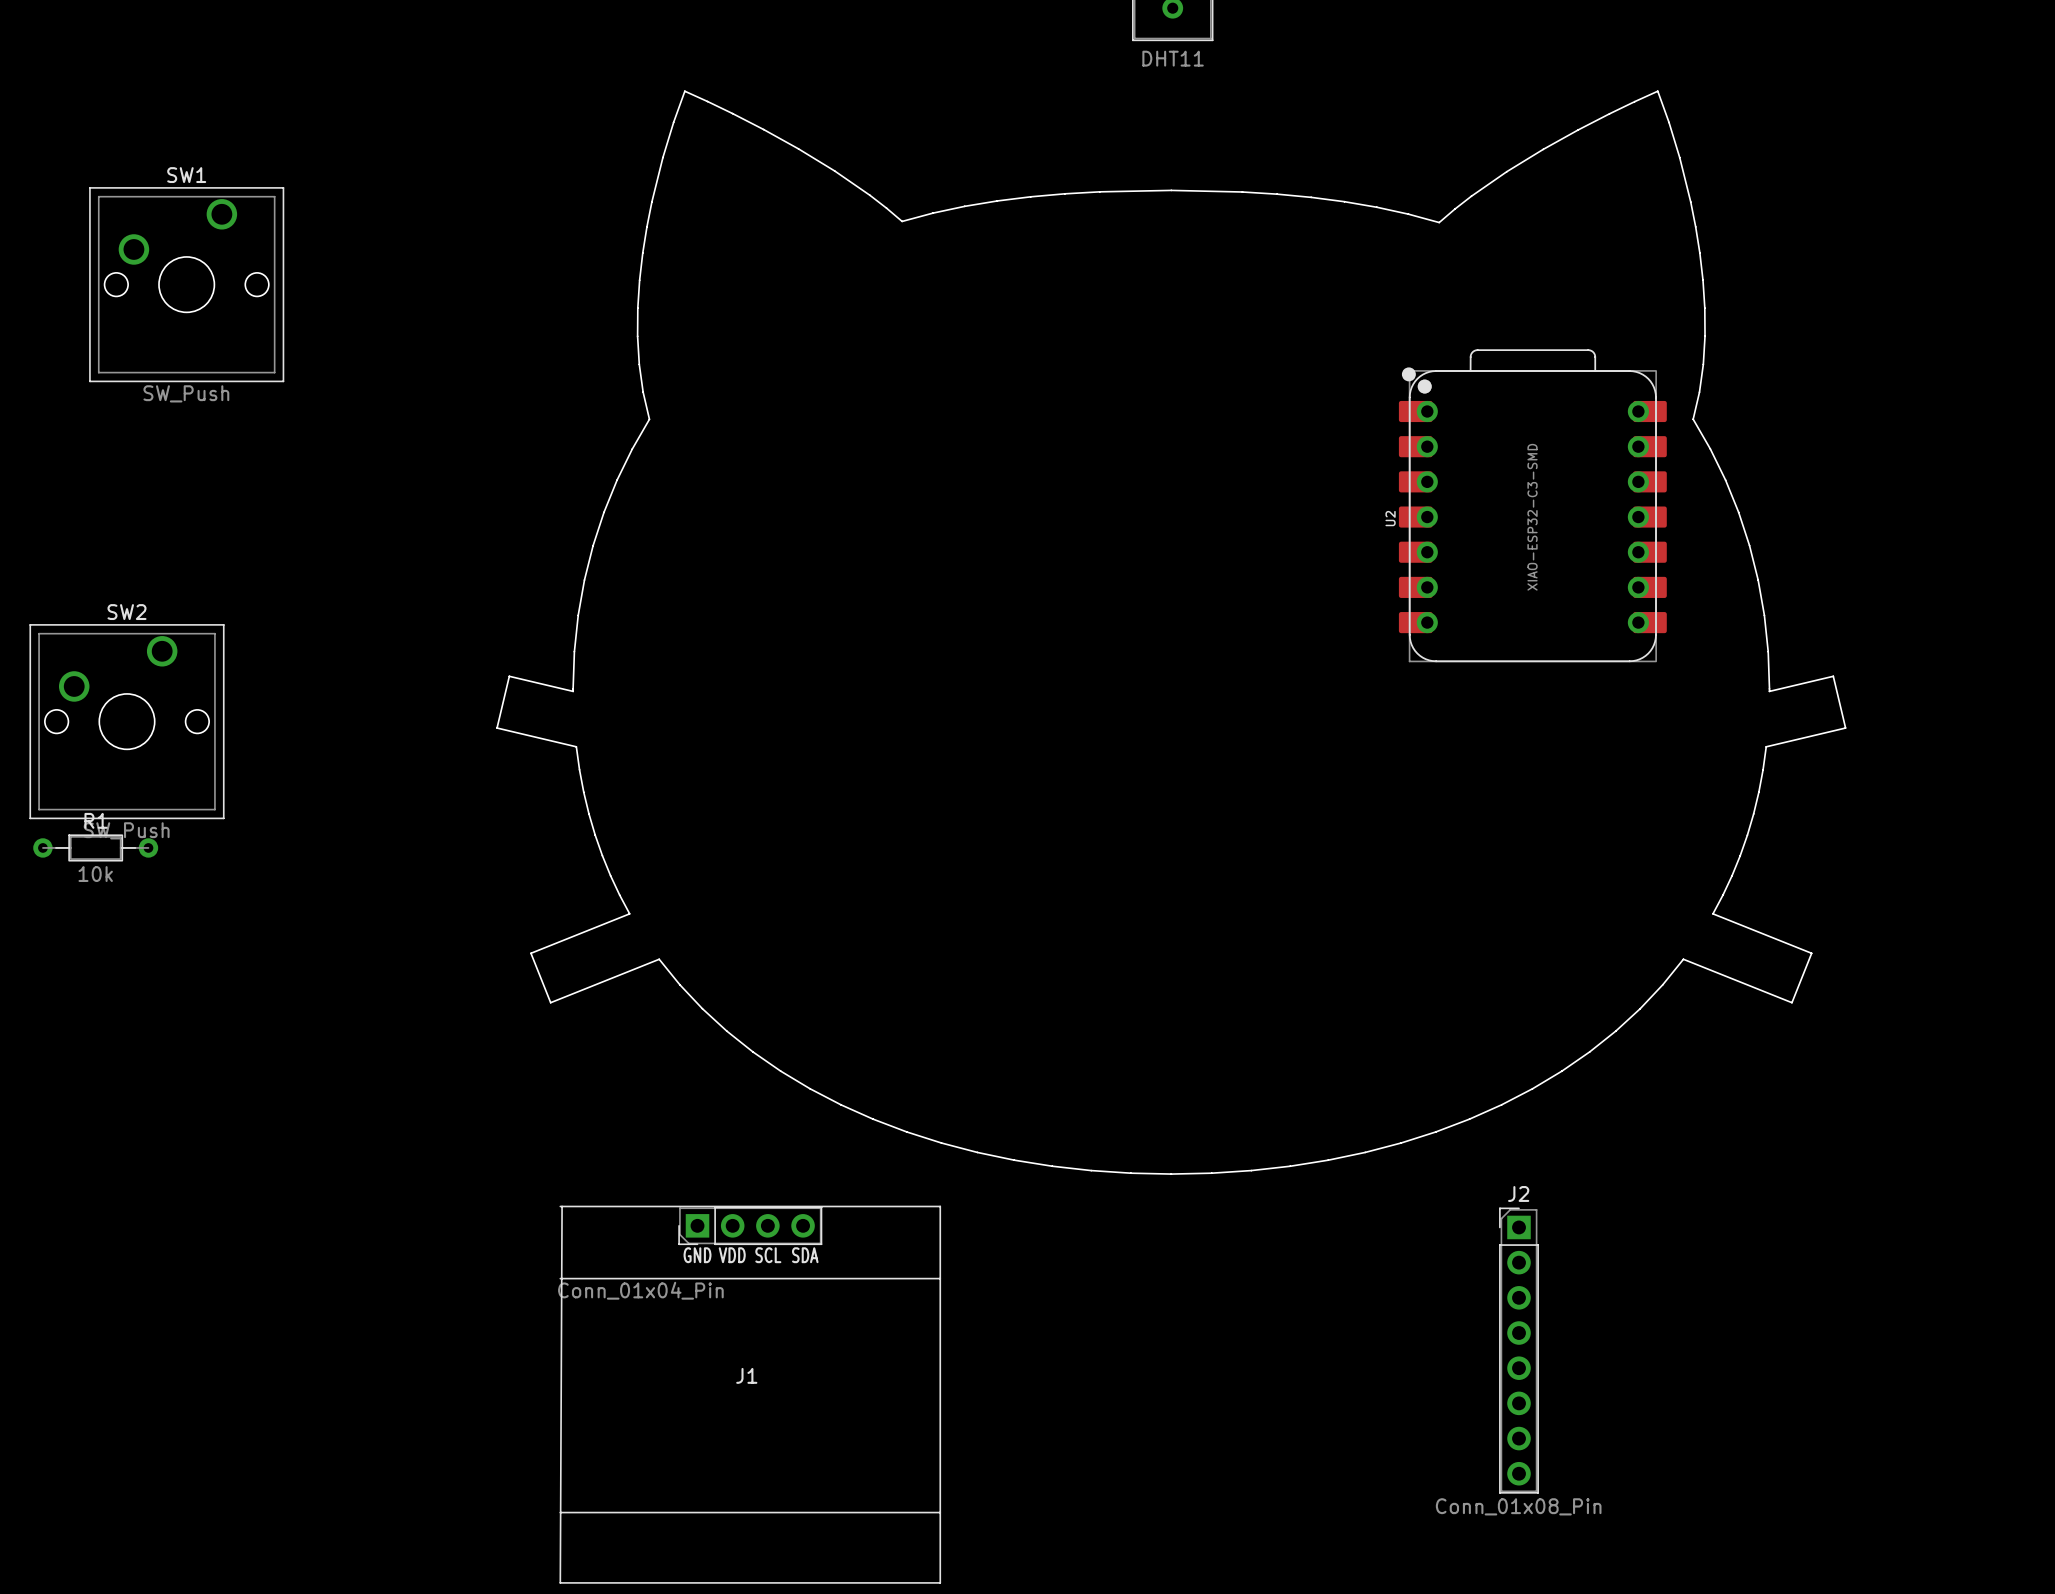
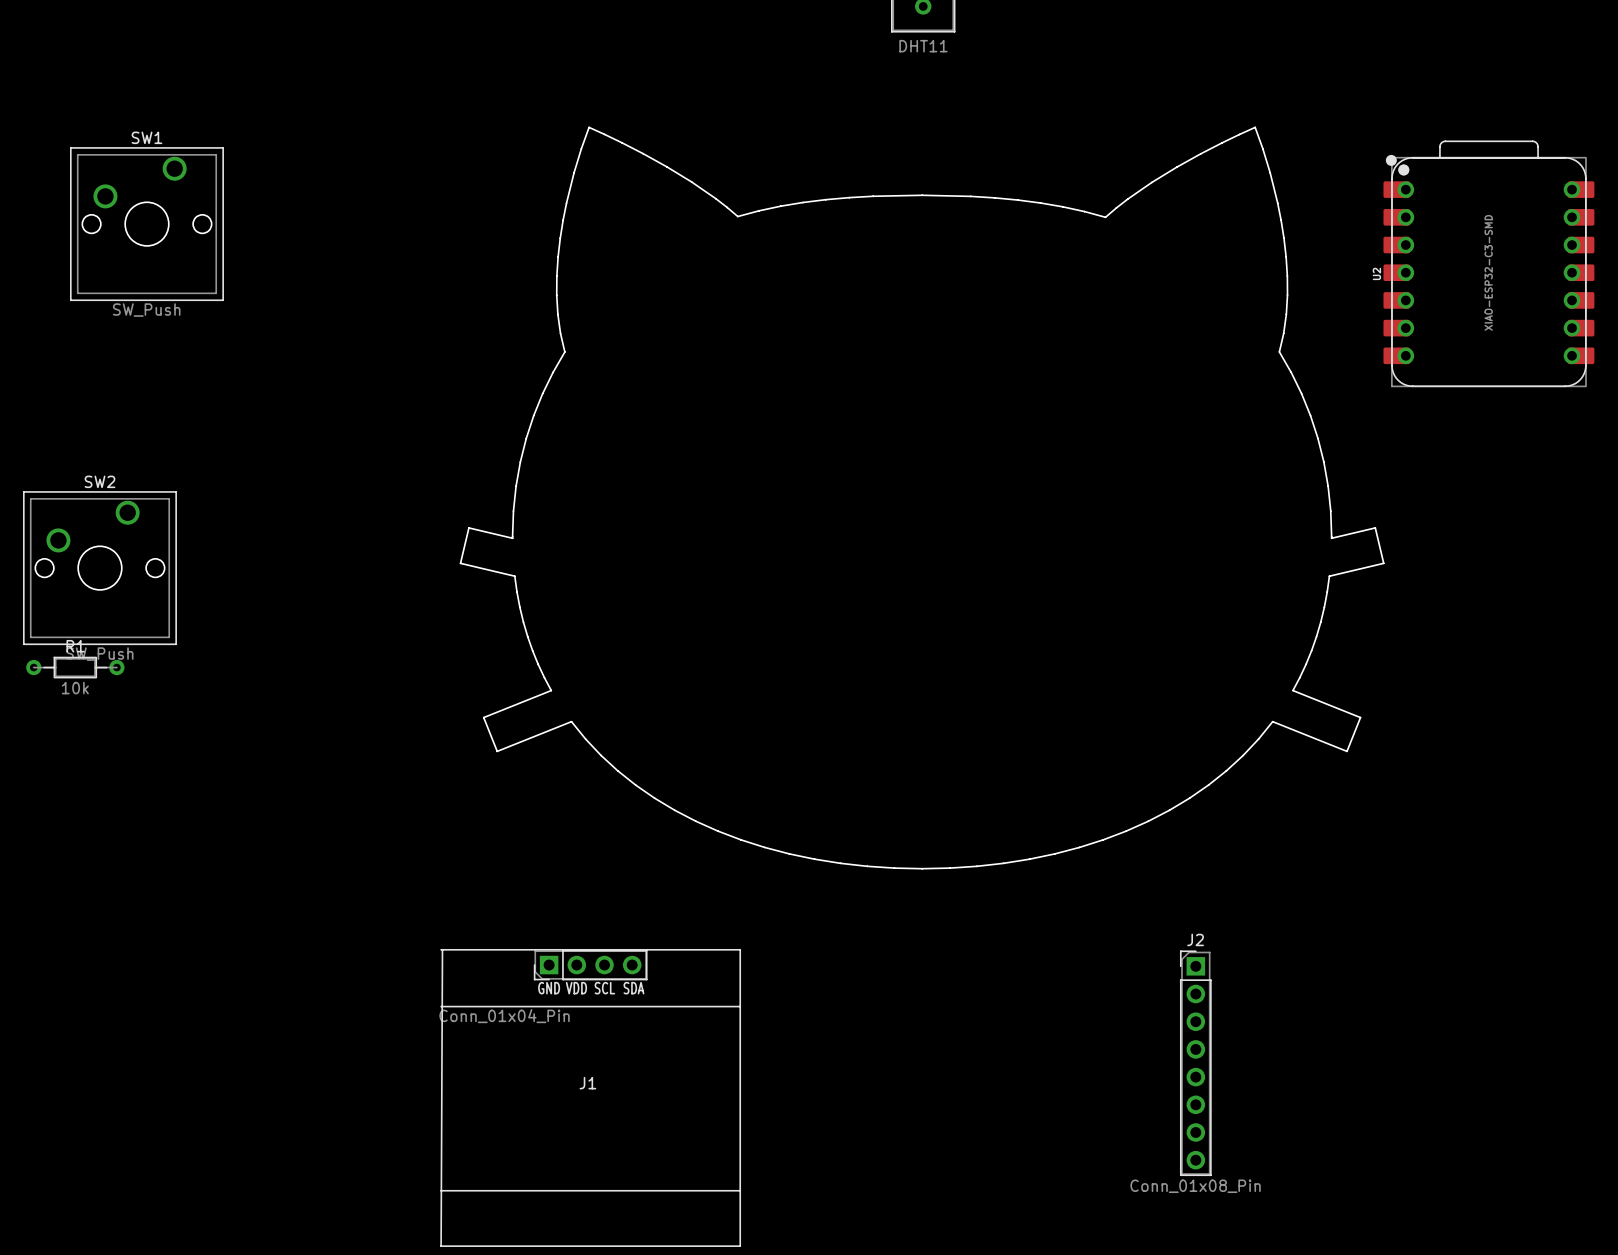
board edge: (684, 91) (662, 157) (651, 201) (639, 280) (637, 336) (639, 364) (649, 419) (617, 480) (593, 545) (578, 615) (573, 691) (509, 676) (497, 728) (576, 746) (583, 792) (595, 835) (610, 875) (629, 913) (530, 953) (550, 1002) (659, 959) (702, 1008) (752, 1051) (810, 1088) (873, 1119) (941, 1143) (1014, 1160) (1091, 1170) (1171, 1174) (1251, 1170) (1328, 1160) (1401, 1143) (1469, 1119) (1532, 1088) (1589, 1051) (1640, 1008) (1683, 959) (1791, 1002) (1811, 953) (1712, 913) (1732, 875) (1747, 835) (1758, 792) (1766, 746) (1845, 728) (1833, 676) (1769, 691) (1764, 615) (1749, 545) (1725, 480) (1693, 419) (1703, 364) (1705, 336) (1703, 280) (1690, 201) (1679, 157) (1657, 91) (1609, 113) (1543, 149) (1471, 196) (1439, 222) (1376, 207) (1311, 197) (1242, 192) (1171, 190) (1099, 191) (1030, 196) (964, 206) (902, 221) (870, 195) (798, 148) (732, 113) (684, 91) -> (589, 127) (566, 203) (558, 256) (557, 314) (564, 351) (542, 393) (526, 438) (516, 486) (512, 538) (468, 527) (460, 563) (514, 576) (519, 607) (527, 636) (551, 690) (483, 717) (497, 751) (571, 721) (601, 755) (635, 785) (674, 810) (717, 831) (764, 847) (814, 859) (867, 866) (922, 868) (976, 866) (1029, 859) (1079, 847) (1126, 831) (1169, 810) (1208, 785) (1243, 755) (1272, 721) (1347, 751) (1360, 717) (1292, 690) (1316, 636) (1324, 607) (1329, 576) (1383, 563) (1375, 527) (1331, 538) (1328, 486) (1317, 438) (1301, 393) (1279, 351) (1286, 314) (1286, 256) (1277, 203) (1255, 127) (1176, 167) (1127, 199) (1105, 217) (1062, 206) (1017, 200) (922, 195) (825, 199) (780, 206) (737, 216) (715, 198) (666, 166) (589, 127)
U2 position: (1532, 505) -> (1488, 263)

